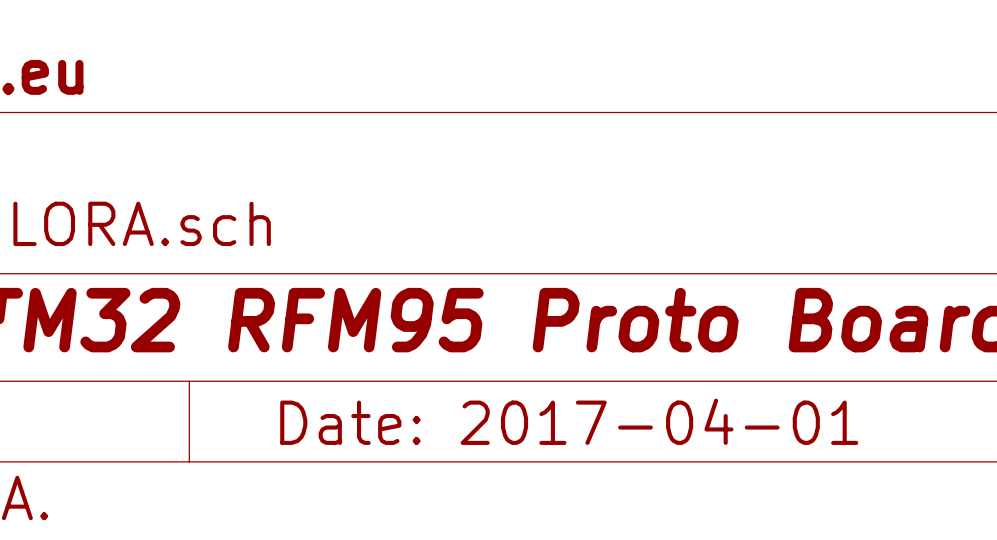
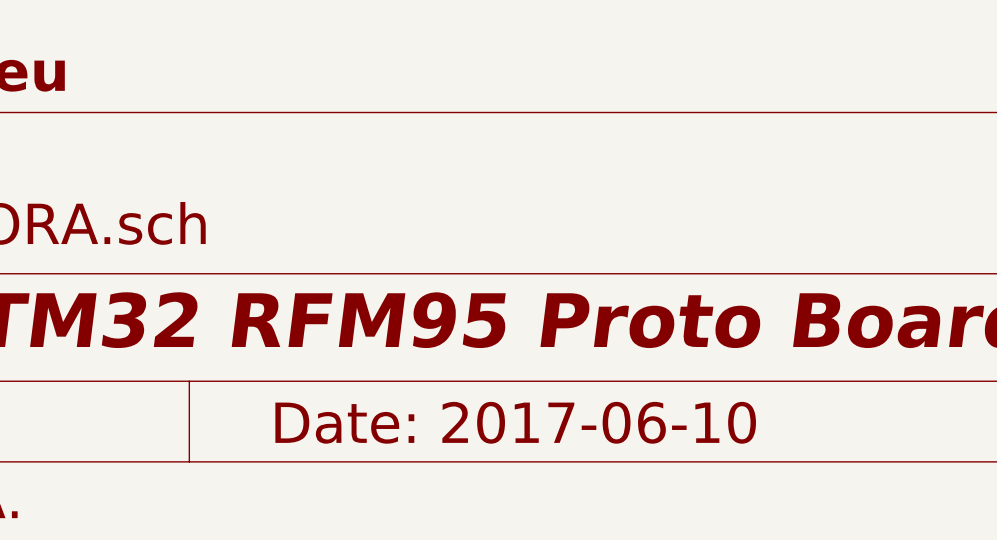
title block: Date: 2017-04-01 (569, 421) -> Date: 2017-06-10 (515, 422)

